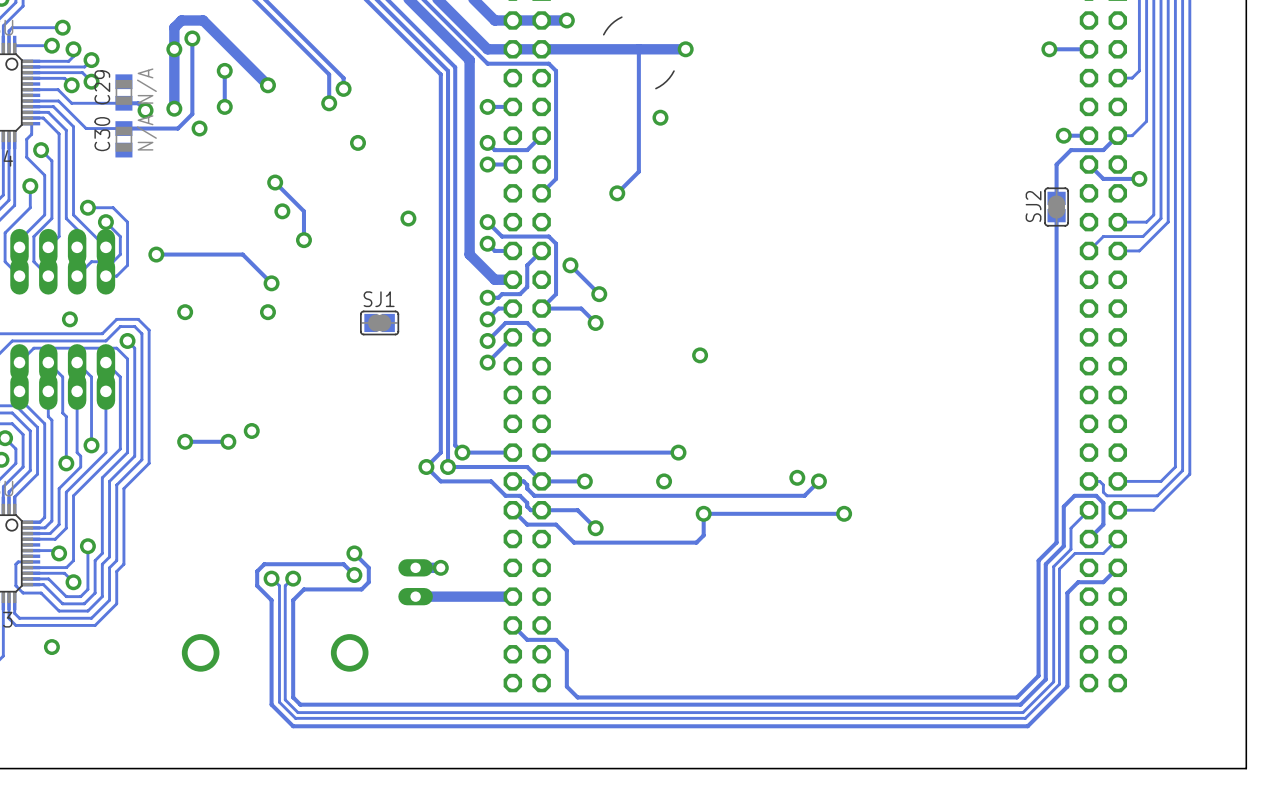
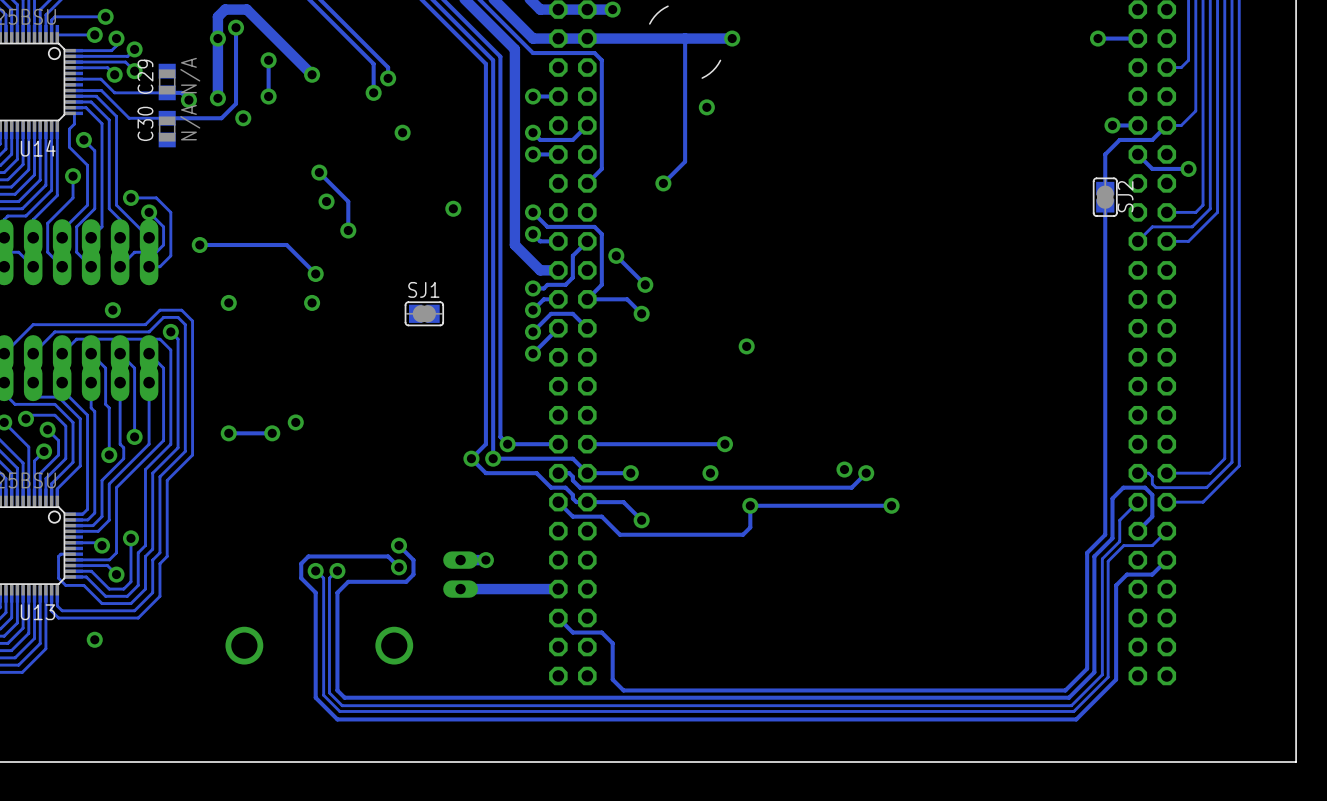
SJ2 name position: SJ2 (1033, 206) -> SJ2 (1125, 196)

